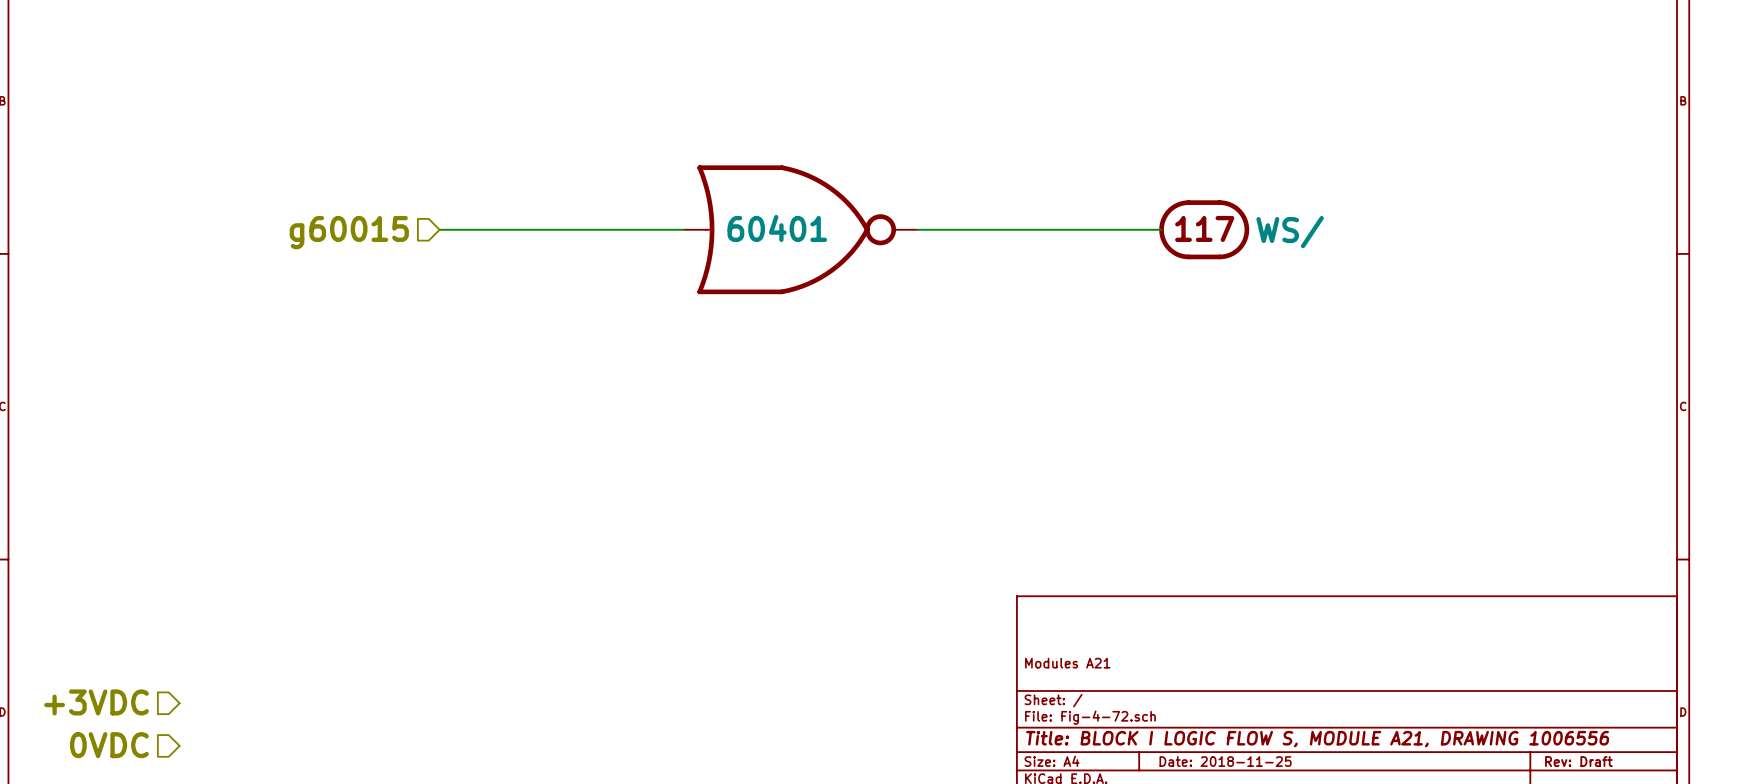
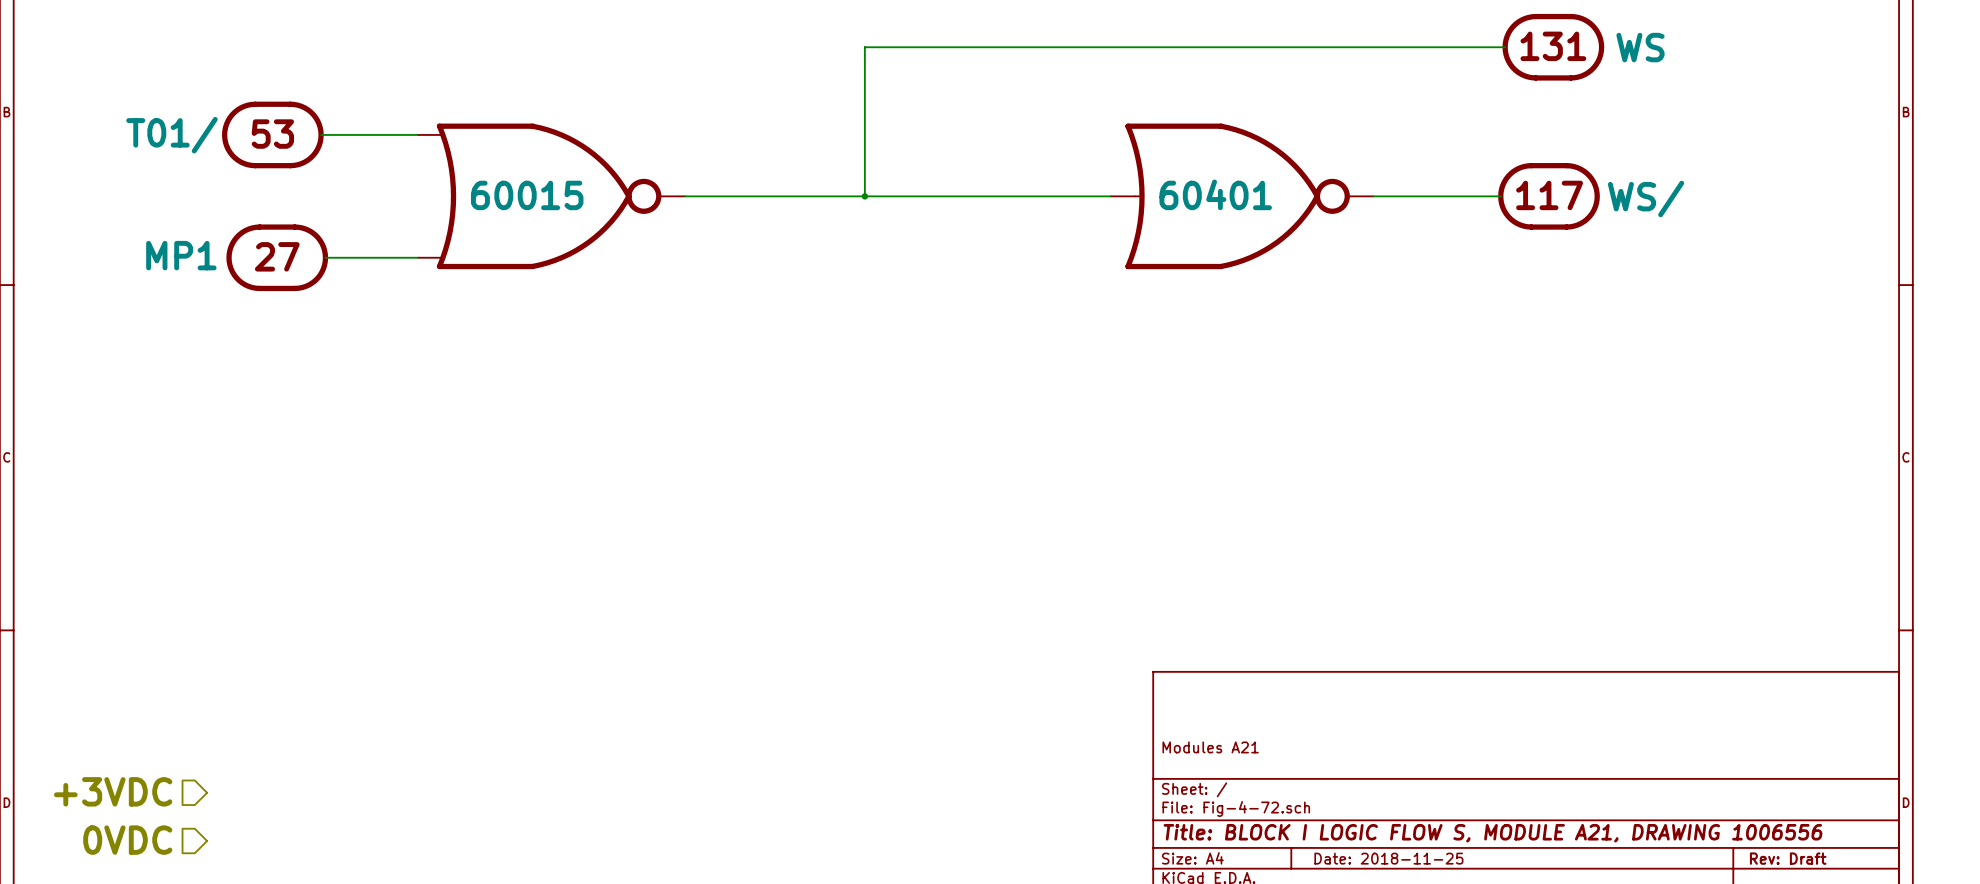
wire: none -> (1505, 47) (864, 47) (864, 196)
part: none -> (1553, 47)
part: none -> (272, 134)
wire: none -> (321, 134) (417, 134)
part: none -> (551, 196)
wire: none -> (685, 196) (1110, 196)
junction: none -> (864, 196)
part: none -> (1242, 196)
wire: none -> (1373, 196) (1500, 196)
part: none -> (1548, 196)
part: none -> (277, 257)
wire: none -> (325, 257) (417, 257)
wire: (439, 229) (684, 229) -> none
part: (800, 229) -> none
wire: (917, 229) (1161, 229) -> none
part: (1204, 229) -> none
hierarchical label: g60015 (349, 232) -> none

